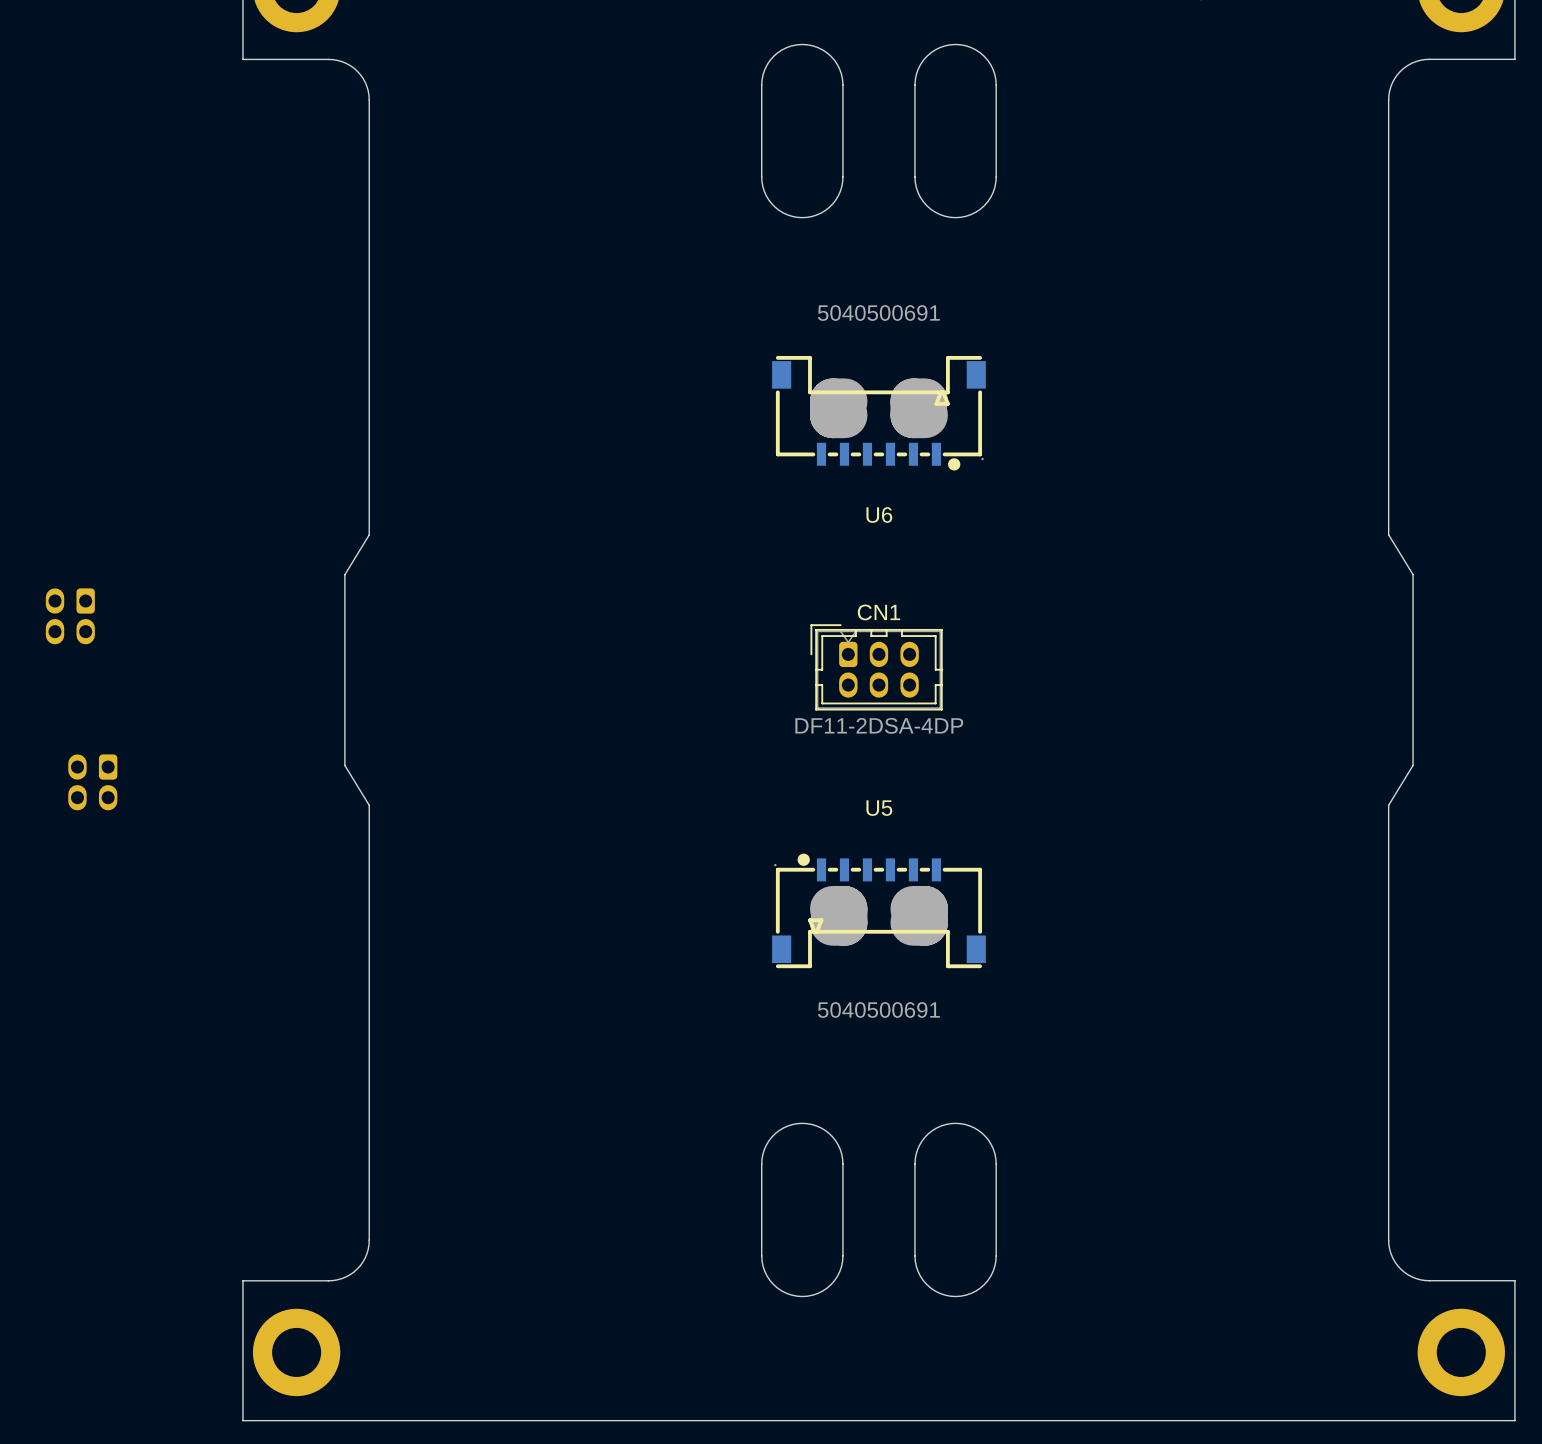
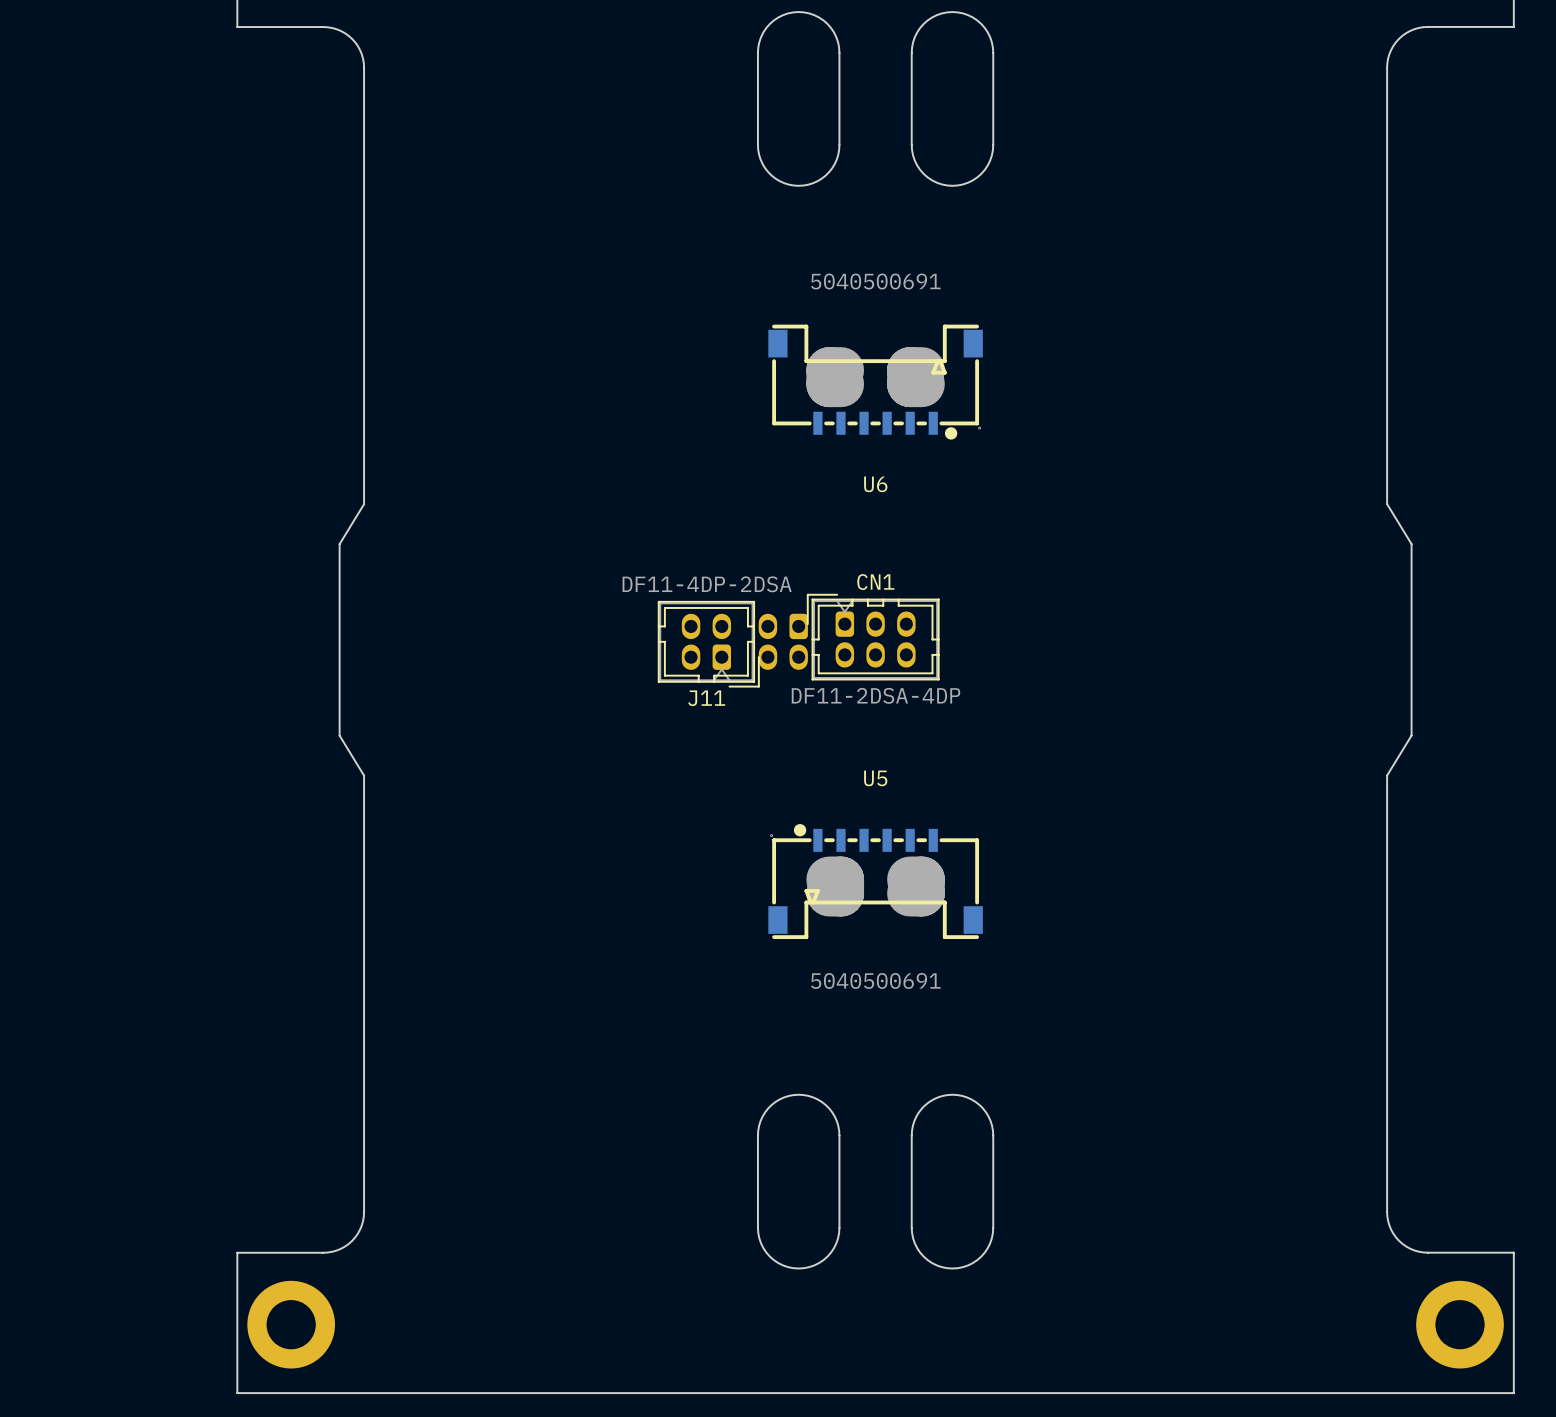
part: (70, 616) -> none
part: none -> (783, 641)
J11: none -> DF11-4DP-2DSA (708, 644)
part: (92, 782) -> none

